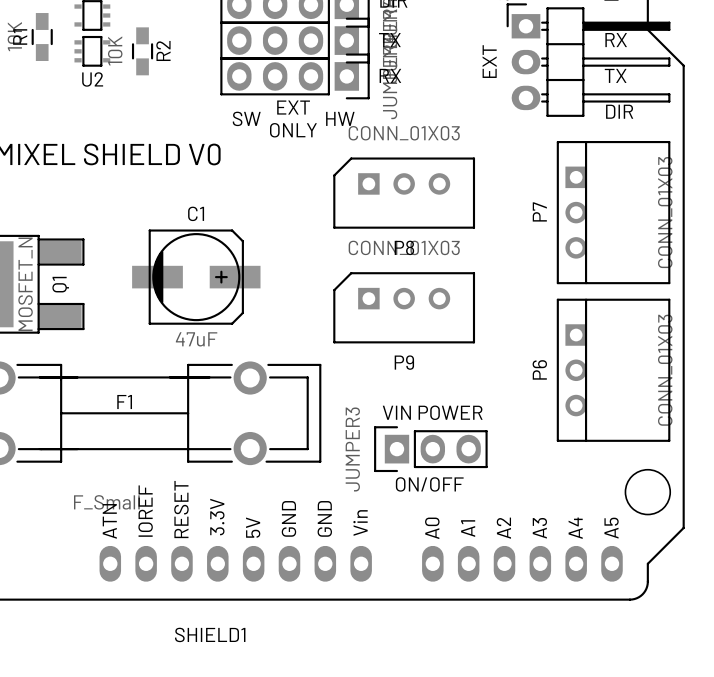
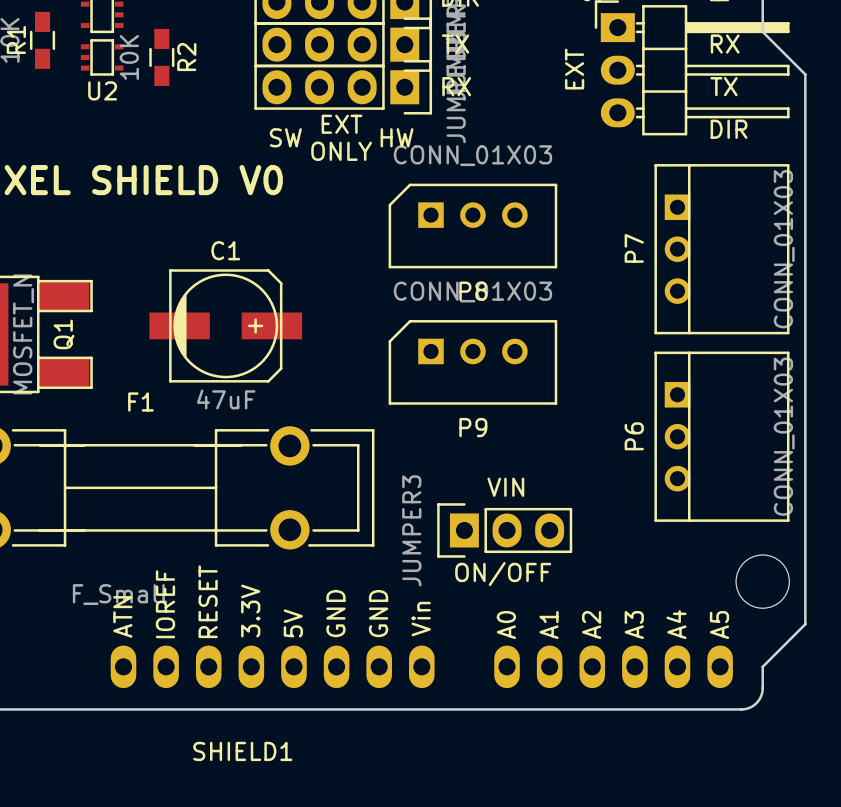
F1 name position: F1 (124, 402) -> F1 (140, 401)
text: VIN POWER (432, 412) -> VIN (505, 487)

